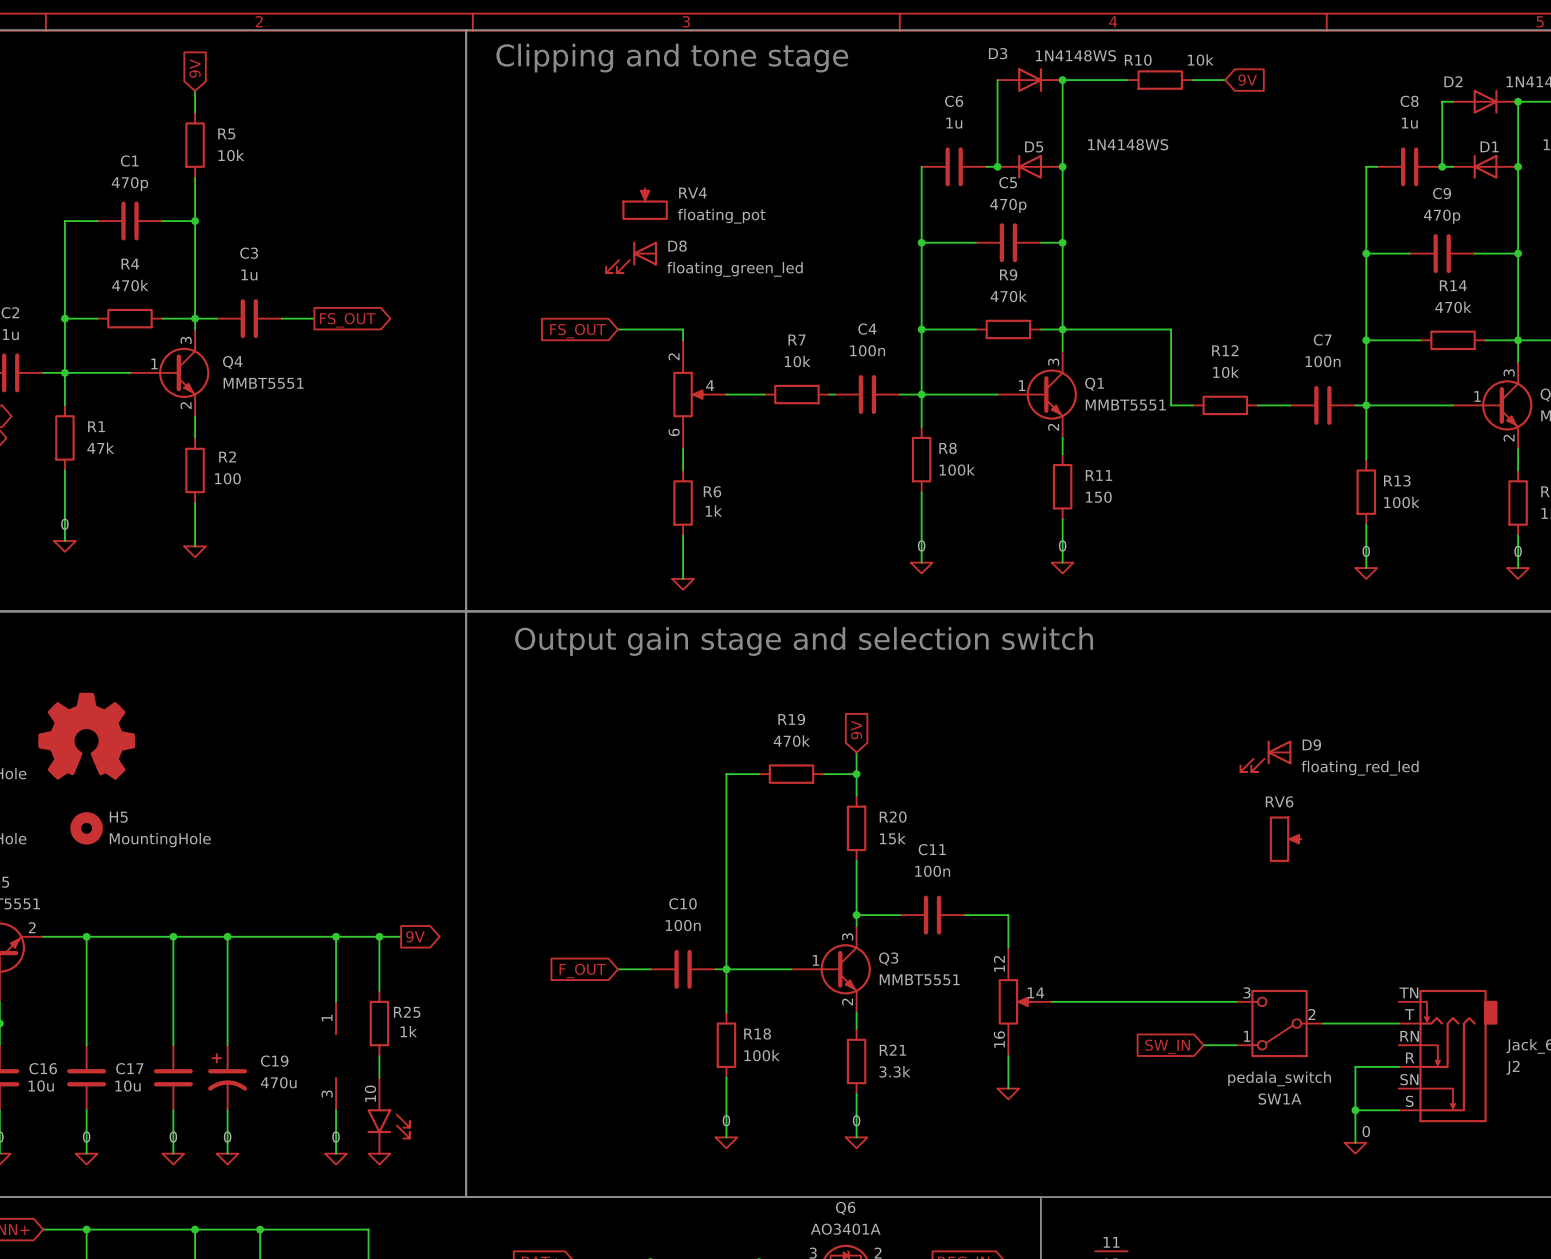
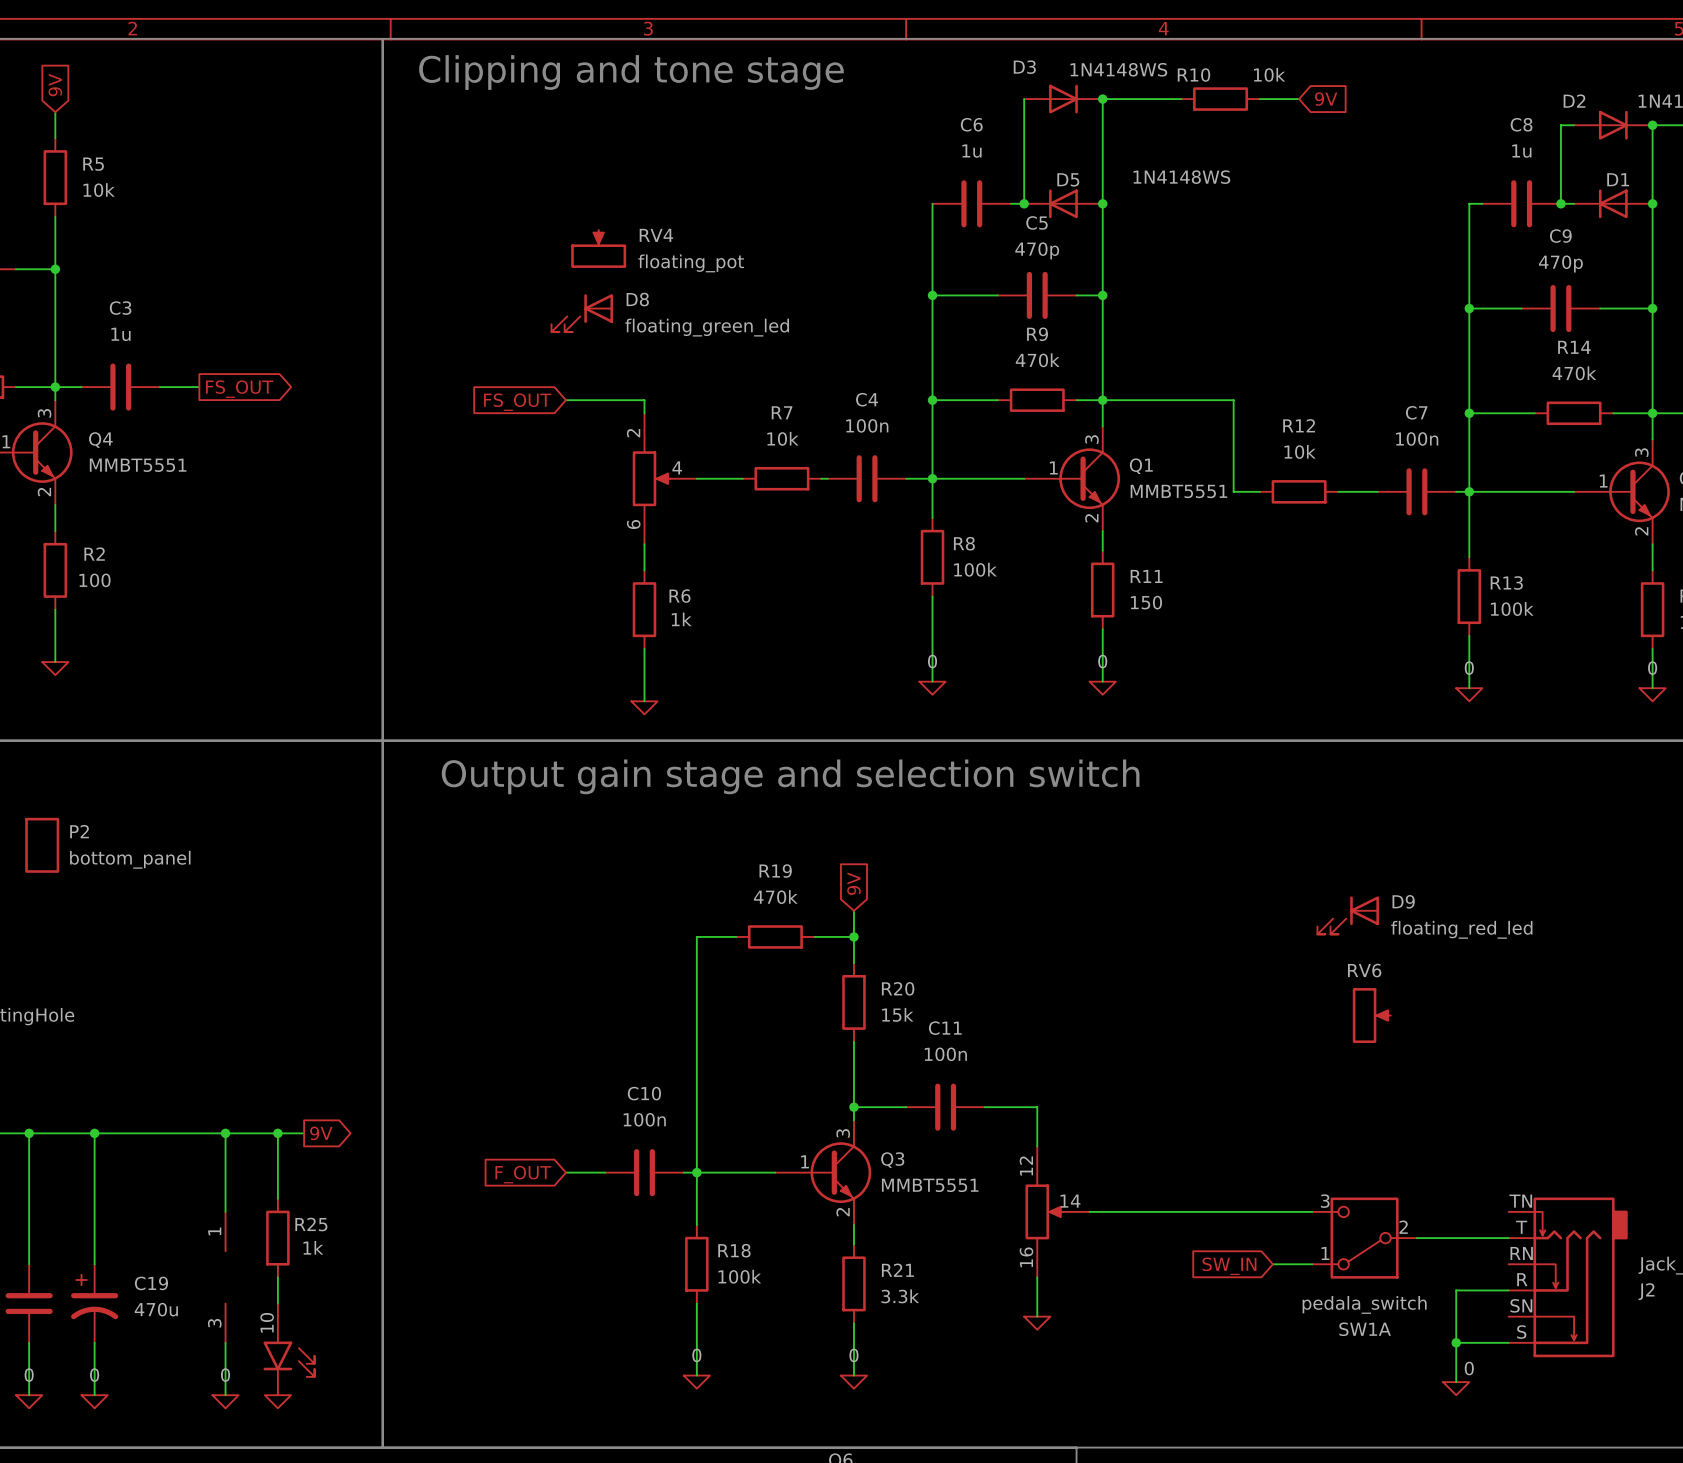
P2: none -> bottom_panel (42, 845)

